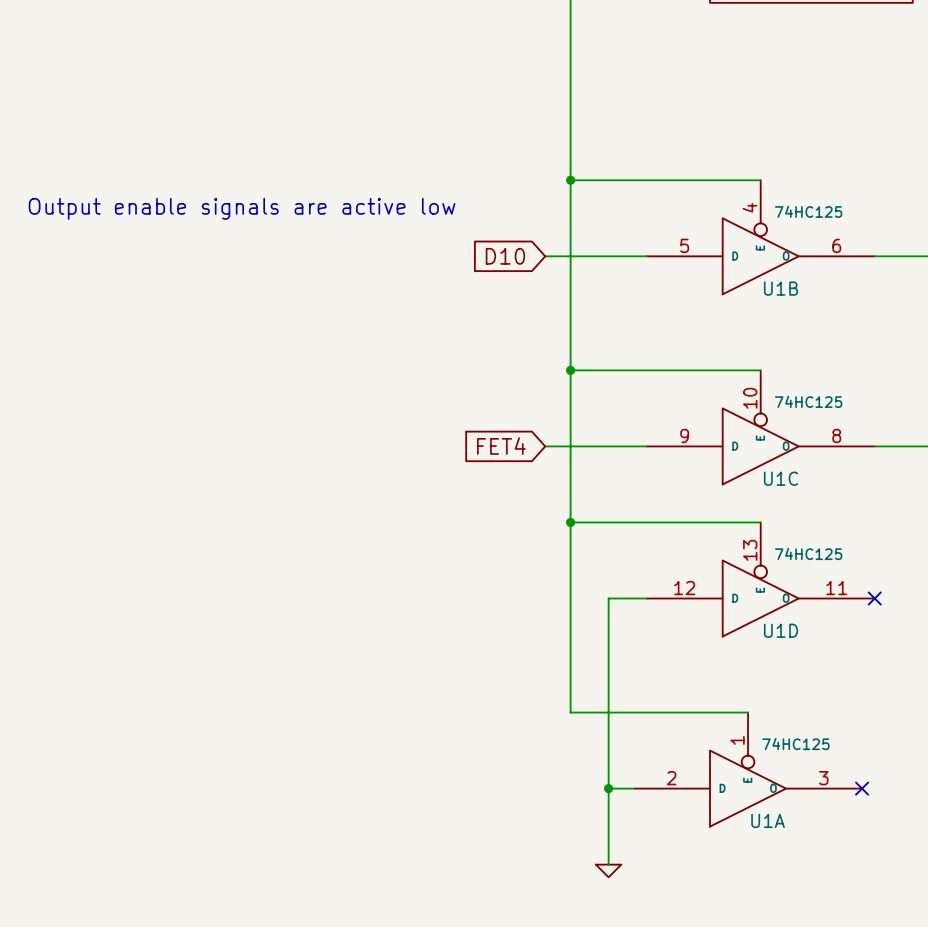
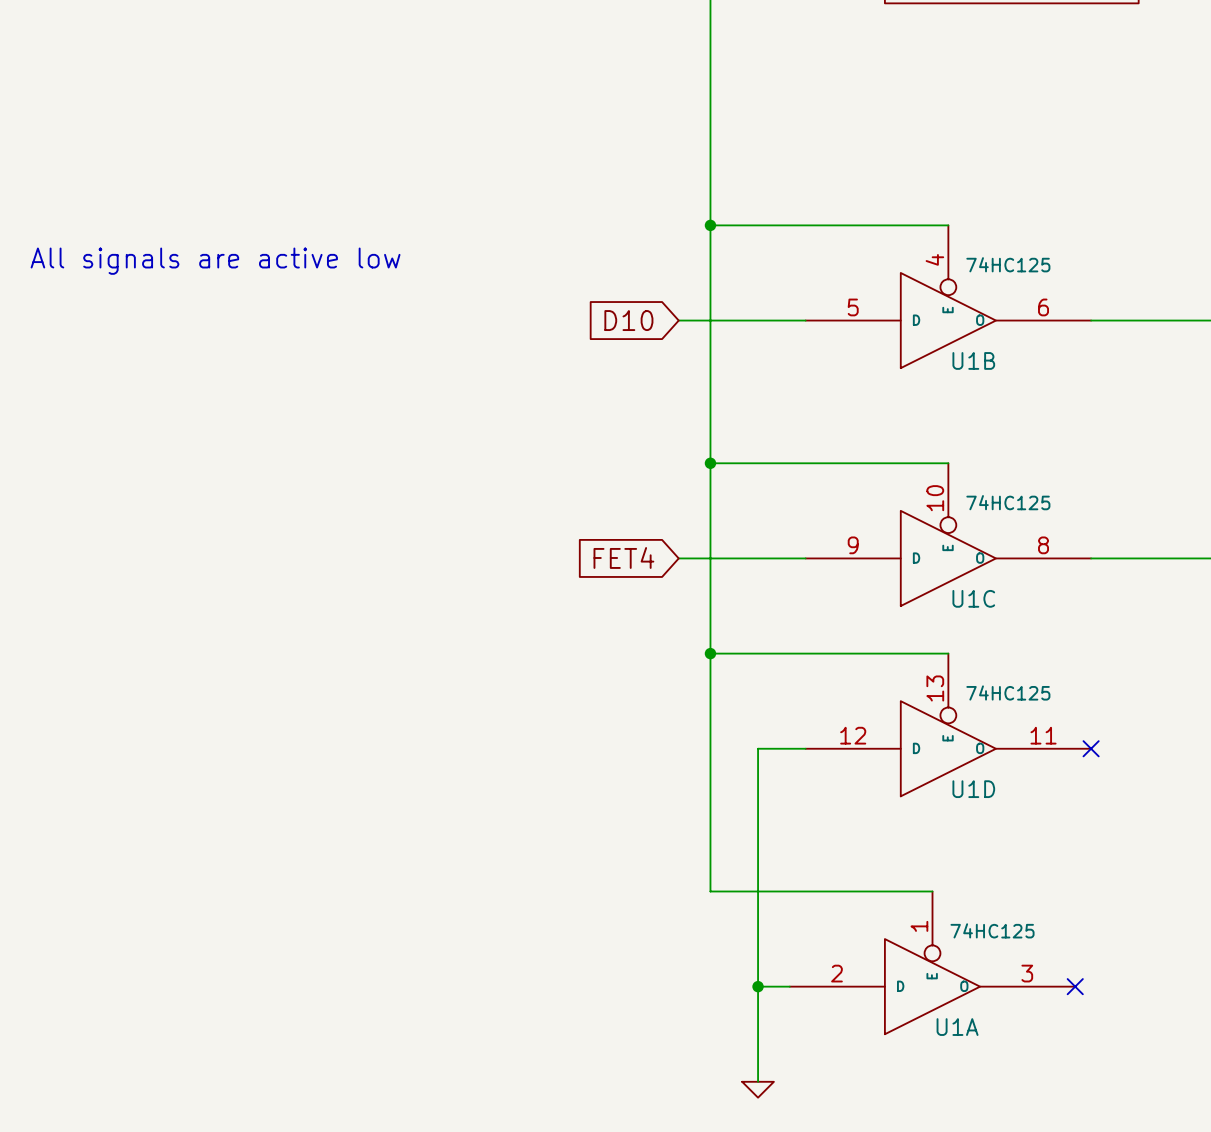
text: Output enable signals are active low (242, 208) -> All signals are active low (215, 261)

